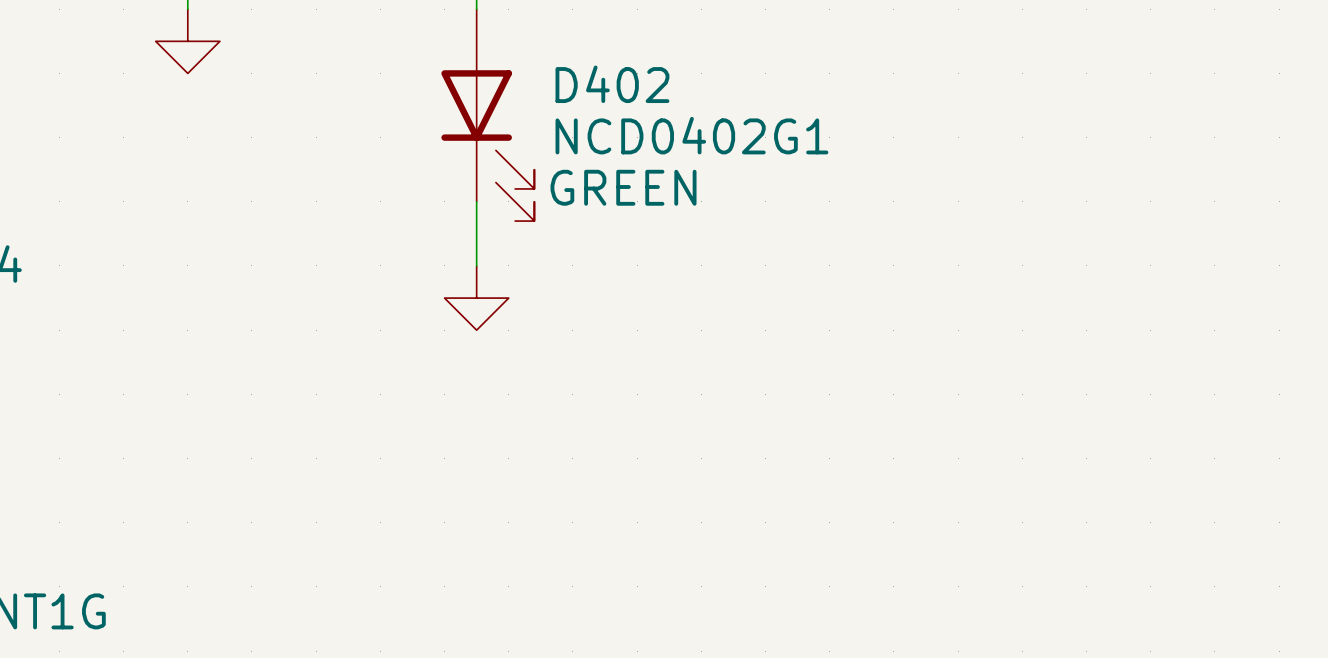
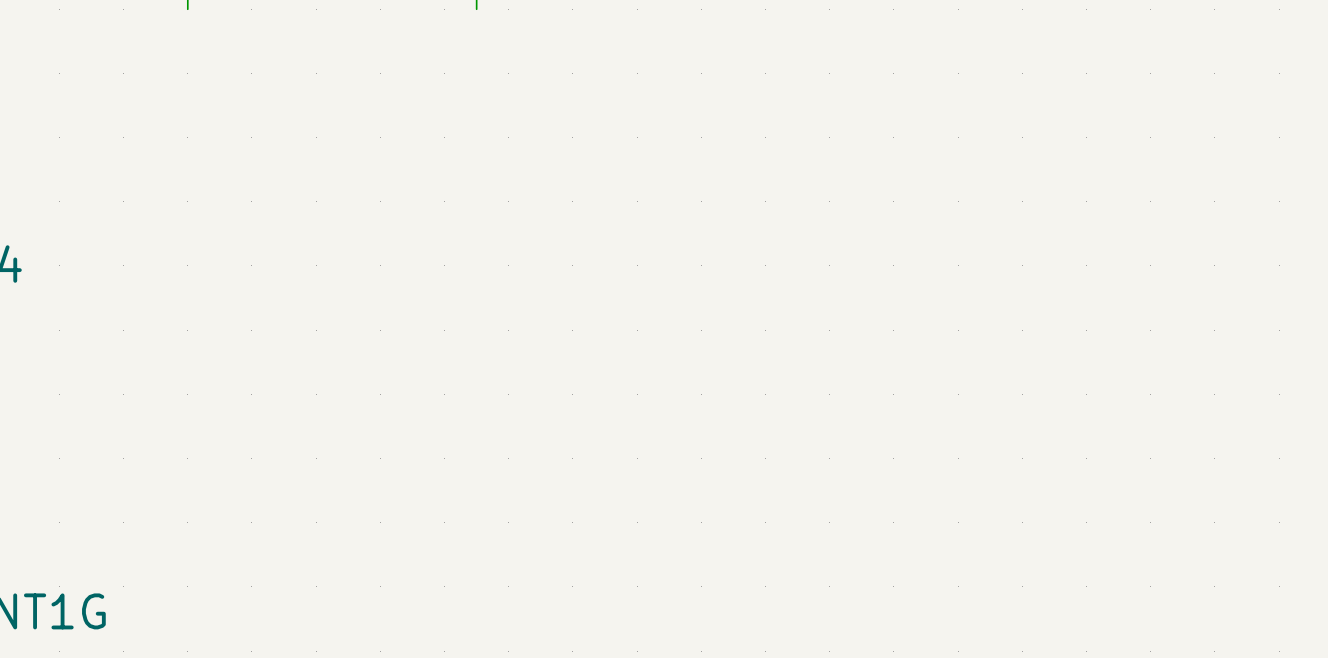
power symbol: (187, 41) -> none
D402: NCD0402G1 (487, 115) -> none
wire: (476, 201) (476, 265) -> none
power symbol: (476, 298) -> none

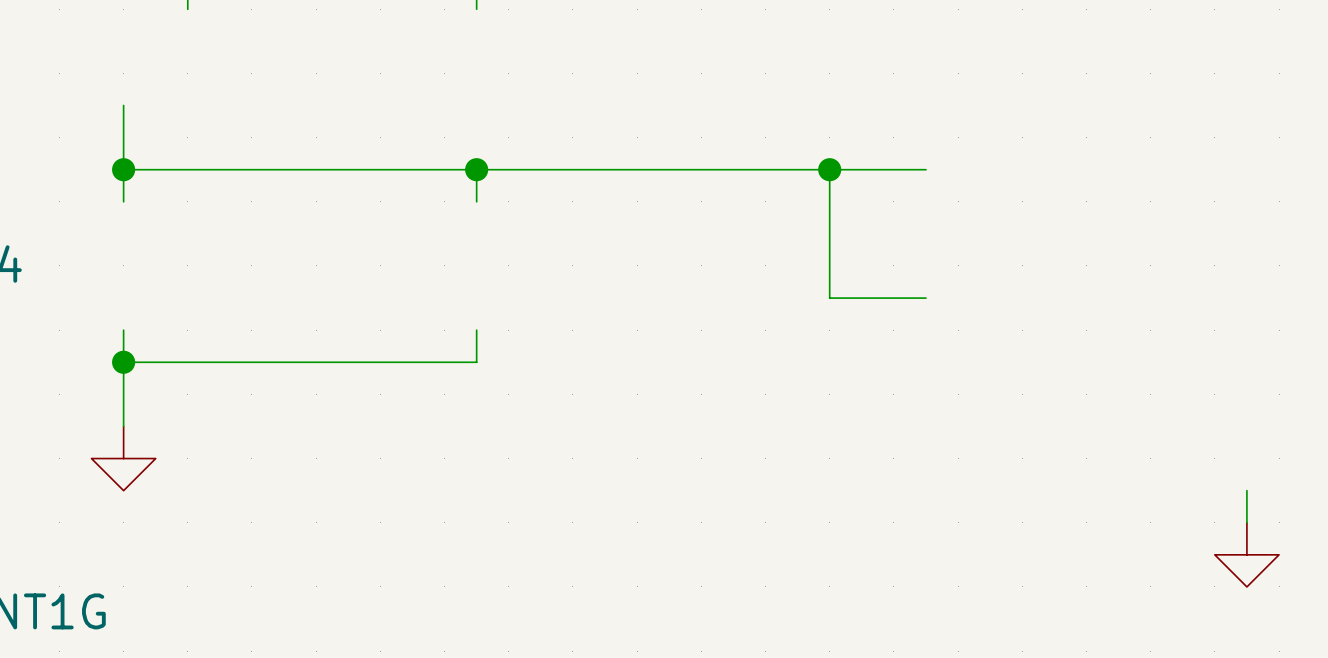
wire: none -> (123, 105) (123, 201)
wire: none -> (123, 169) (925, 169)
junction: none -> (123, 169)
wire: none -> (476, 169) (476, 201)
junction: none -> (476, 169)
wire: none -> (829, 169) (829, 298) (925, 298)
junction: none -> (829, 169)
wire: none -> (123, 330) (123, 426)
wire: none -> (476, 330) (476, 362) (123, 362)
junction: none -> (123, 362)
power symbol: none -> (123, 458)
wire: none -> (1246, 490) (1246, 522)
power symbol: none -> (1246, 554)

